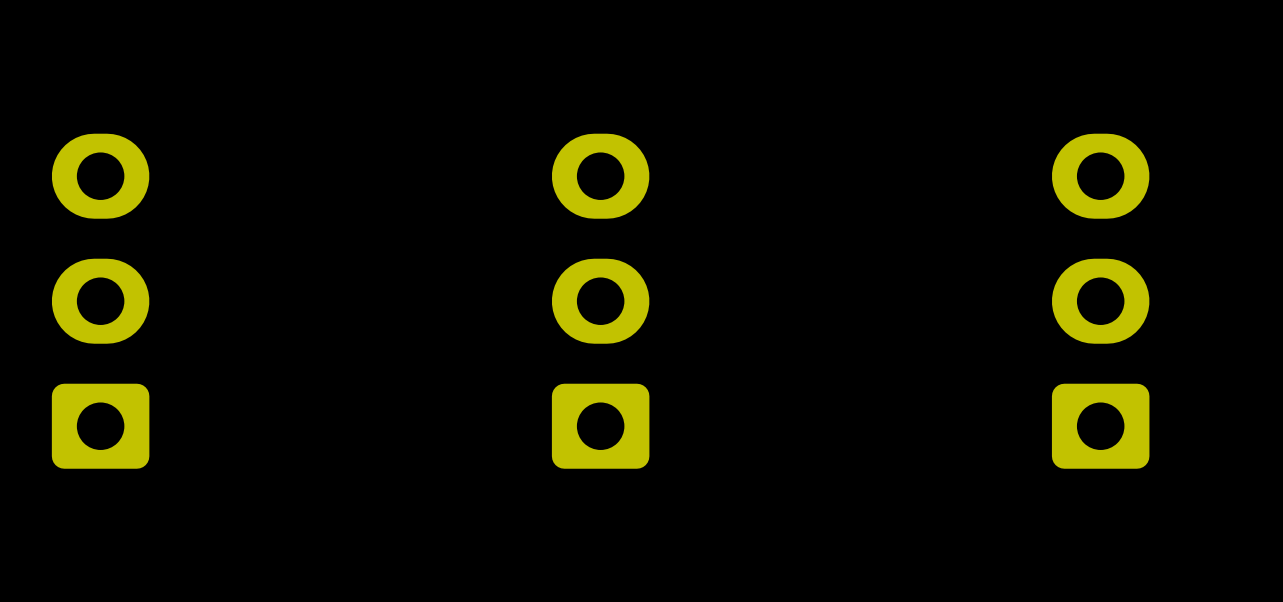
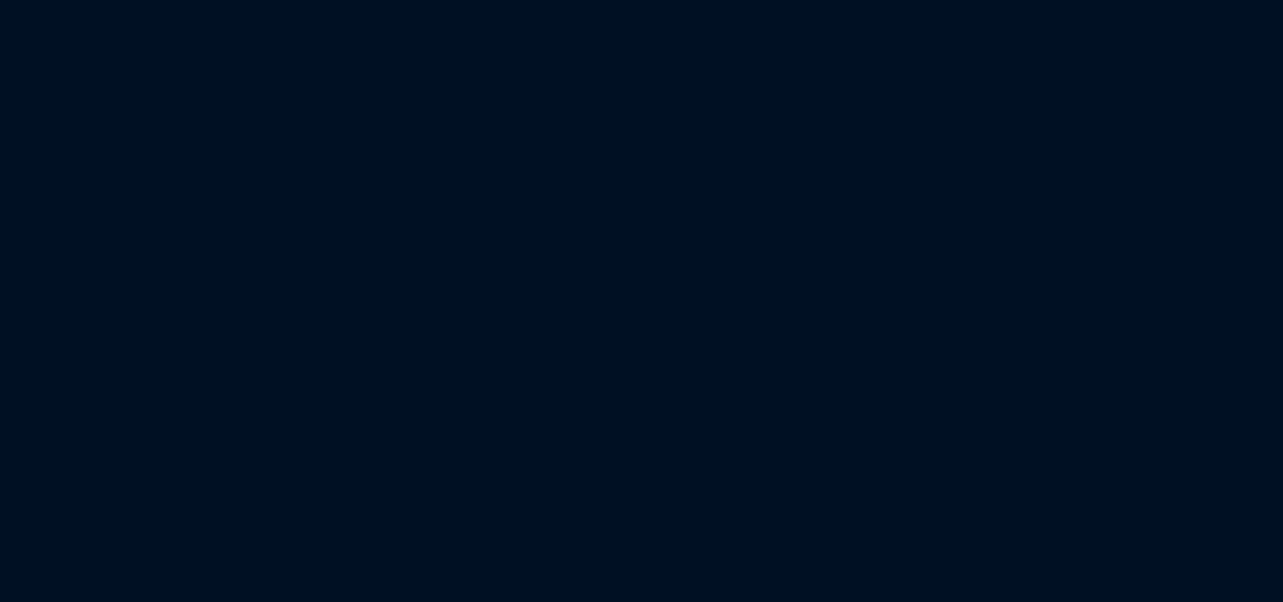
part: (100, 301) -> none
part: (600, 301) -> none
part: (1100, 301) -> none

